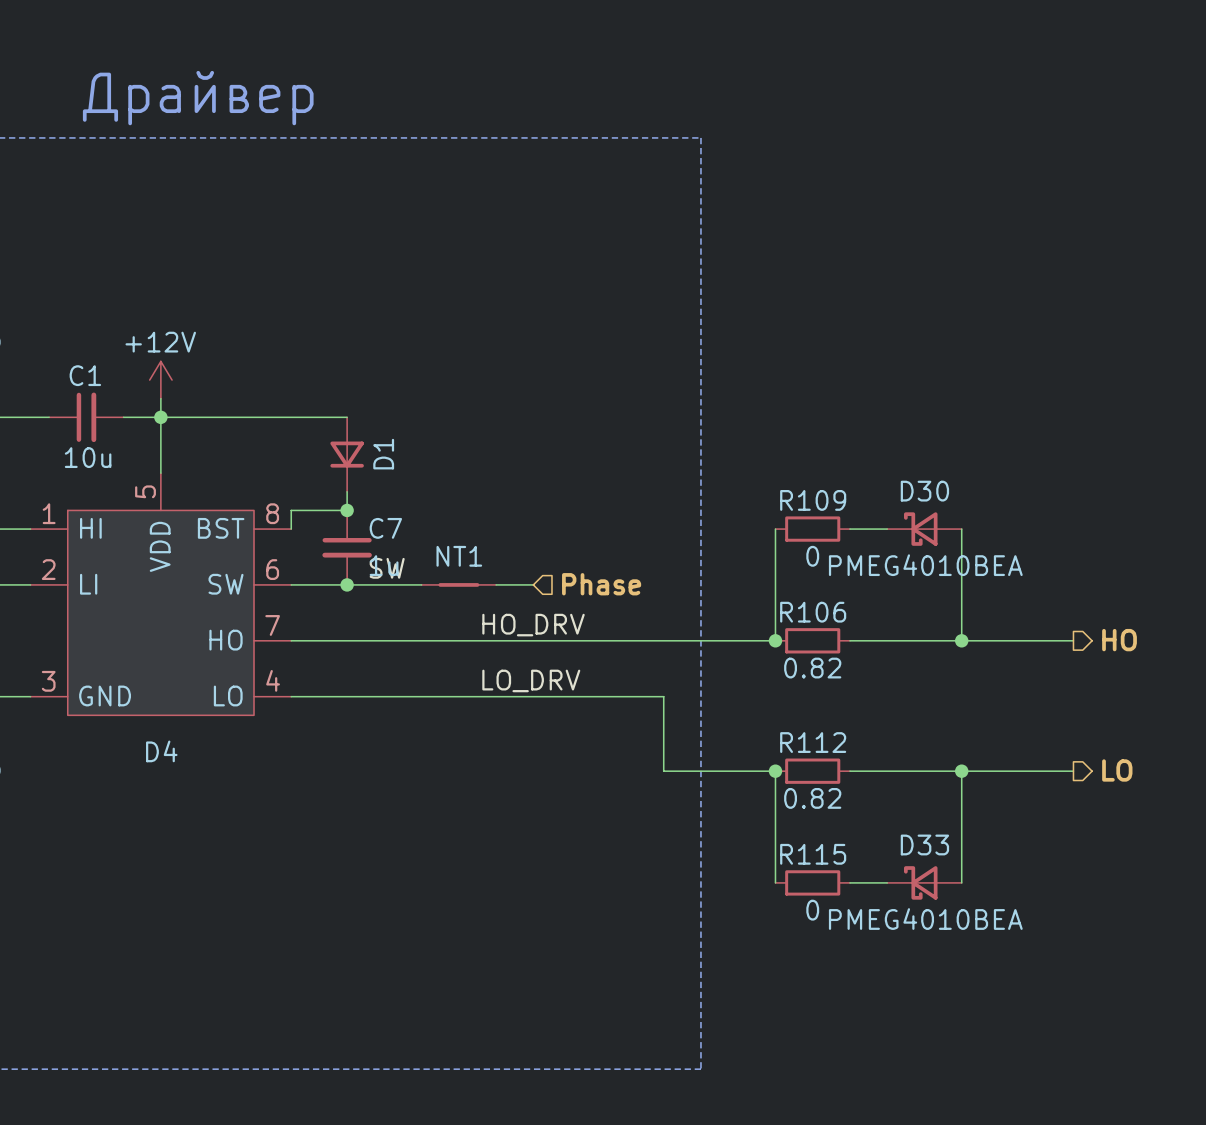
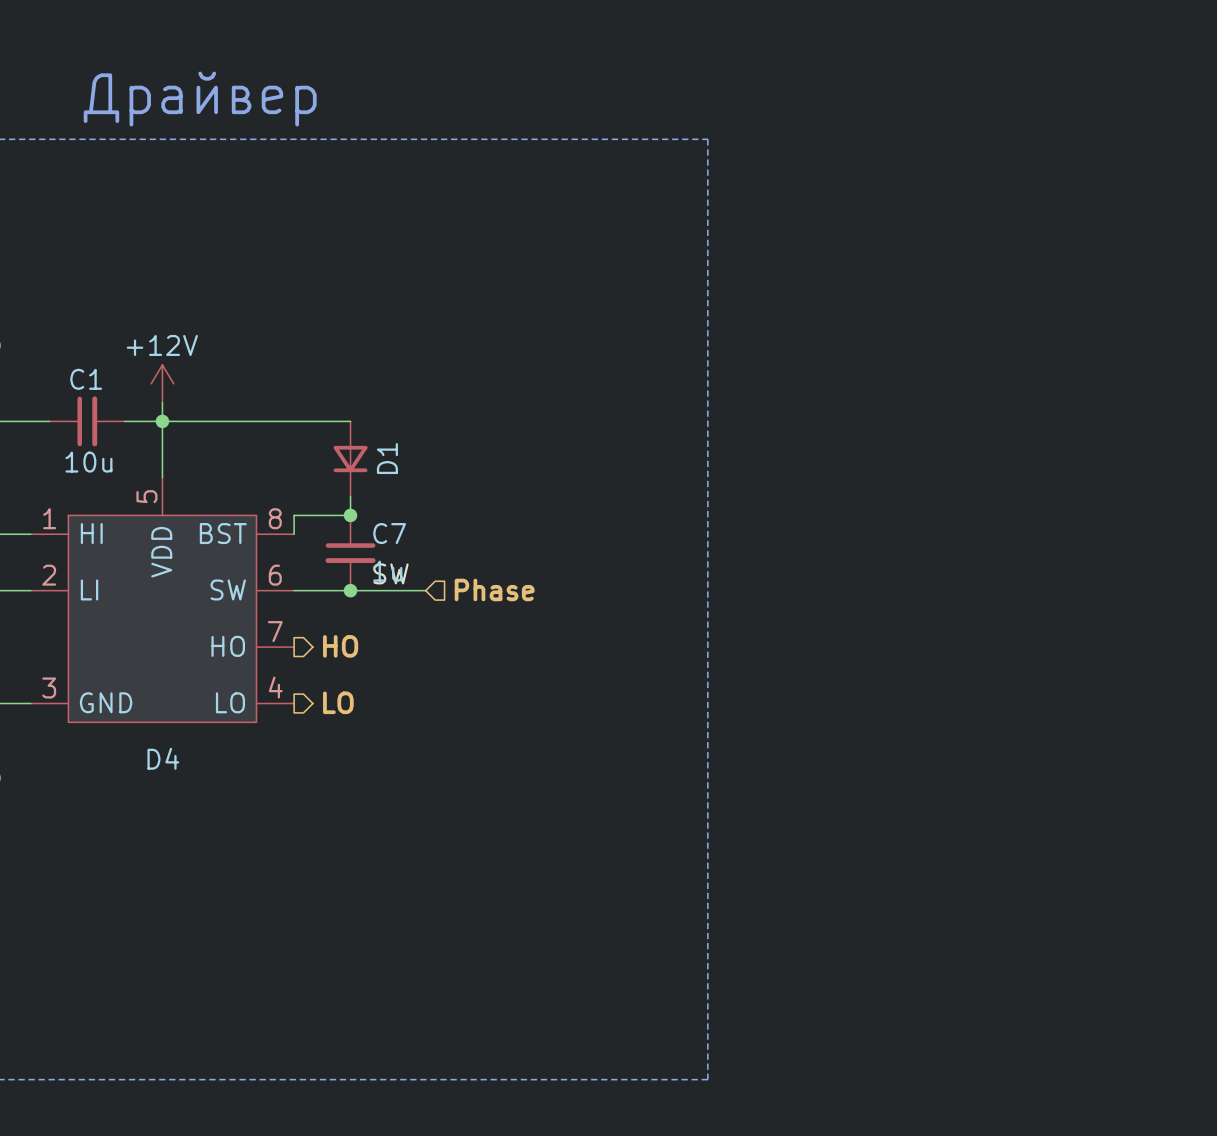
wire: (775, 529) (775, 640) (291, 640) -> none
R109: 0 (812, 529) -> none
wire: (849, 529) (887, 529) -> none
D30: PMEG4010BEA (924, 529) -> none
wire: (961, 529) (961, 640) -> none
NT1: (458, 584) -> none
wire: (496, 584) (533, 584) -> none
hierarchical label position: Phase (601, 584) -> Phase (494, 589)
label: HO_DRV (533, 625) -> none
hierarchical label: none -> HO (340, 646)
junction: (775, 640) -> none
R106: 0.82 (812, 640) -> none
wire: (849, 640) (1073, 640) -> none
junction: (961, 640) -> none
hierarchical label: HO (1119, 640) -> none
label: LO_DRV (531, 680) -> none
hierarchical label: none -> LO (338, 702)
wire: (291, 696) (663, 696) (663, 771) (775, 771) (775, 882) -> none
hierarchical label: LO (1117, 770) -> none
junction: (775, 771) -> none
R112: 0.82 (812, 771) -> none
wire: (849, 771) (1073, 771) -> none
wire: (961, 771) (961, 882) -> none
junction: (961, 771) -> none
R115: 0 (812, 882) -> none
wire: (849, 882) (887, 882) -> none
D33: PMEG4010BEA (924, 882) -> none

